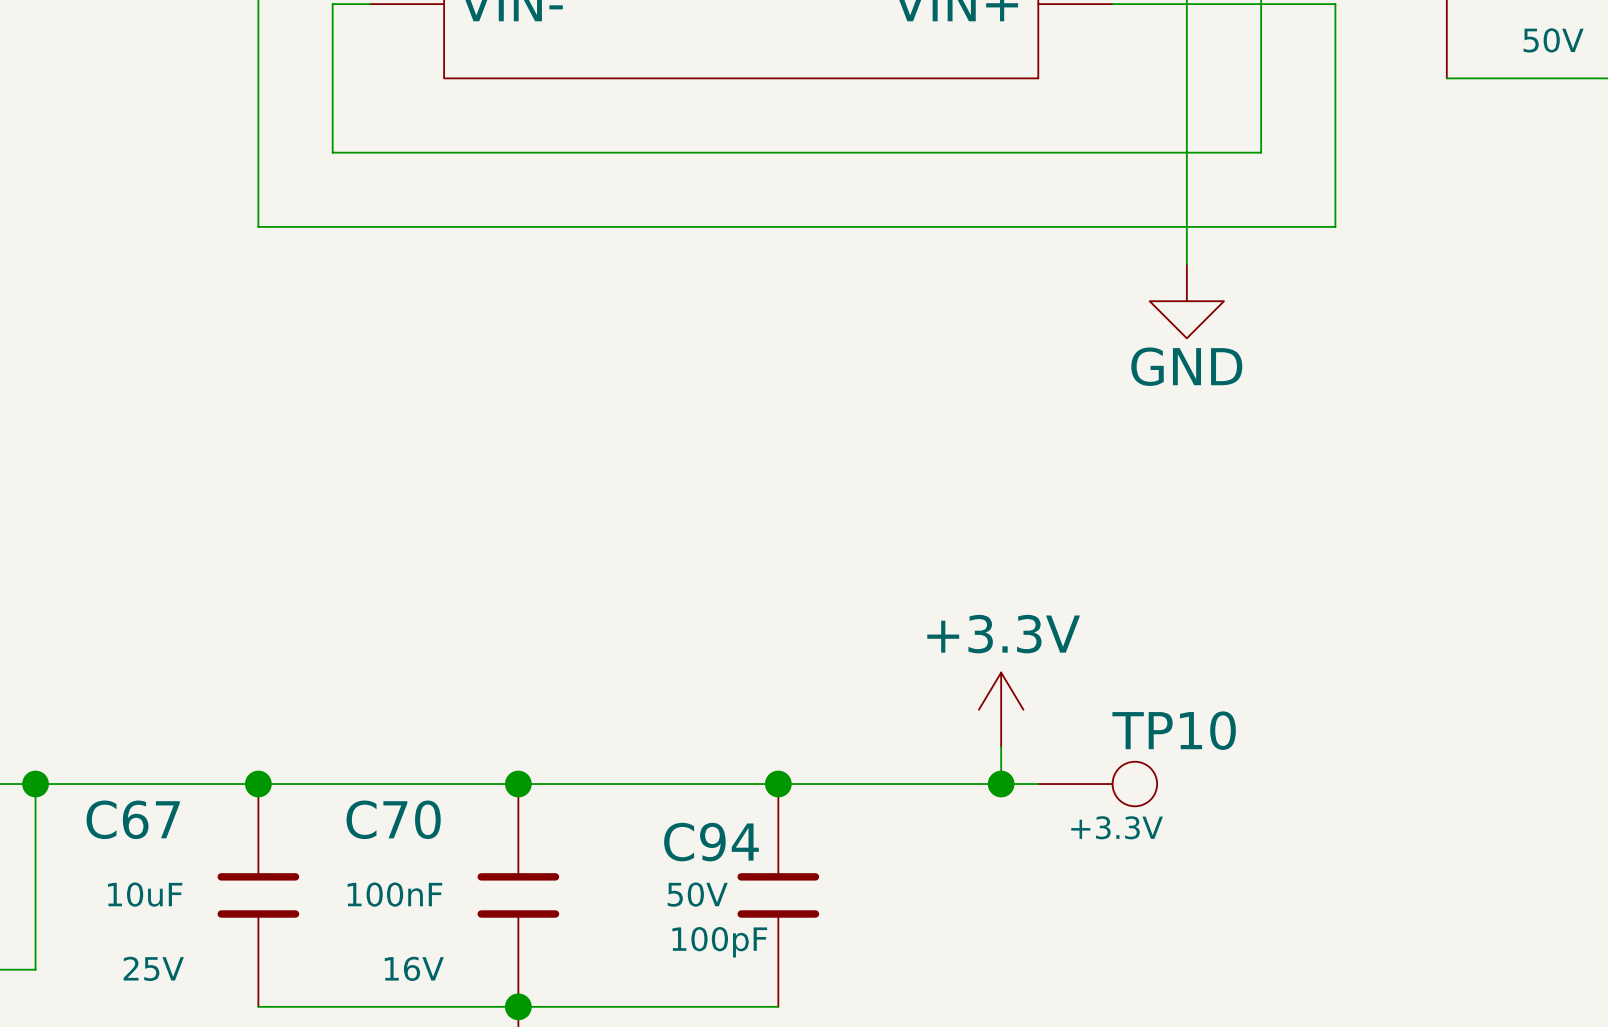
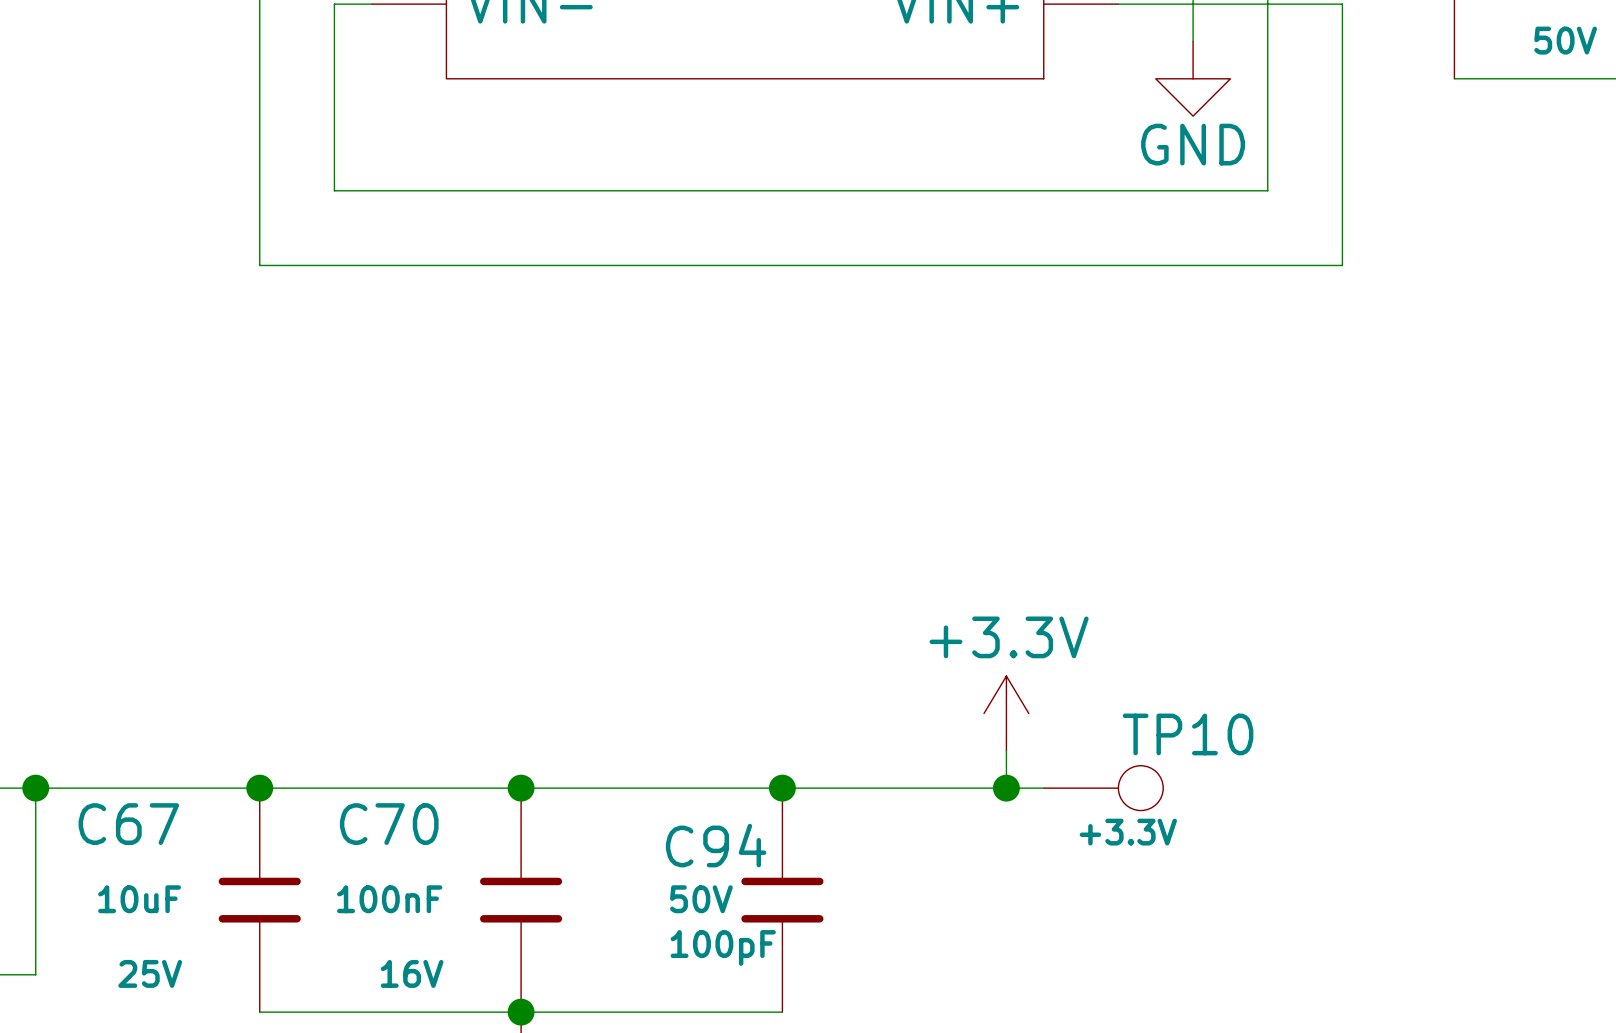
wire: (1186, 41) (1186, 264) -> none
wire: (332, 152) (1261, 152) -> (334, 153) (334, 190) (1267, 190) (1267, 153)
wire: (258, 226) (1335, 226) -> (259, 228) (259, 265) (1342, 265) (1342, 228)
power symbol position: GND (1186, 301) -> GND (1193, 78)

